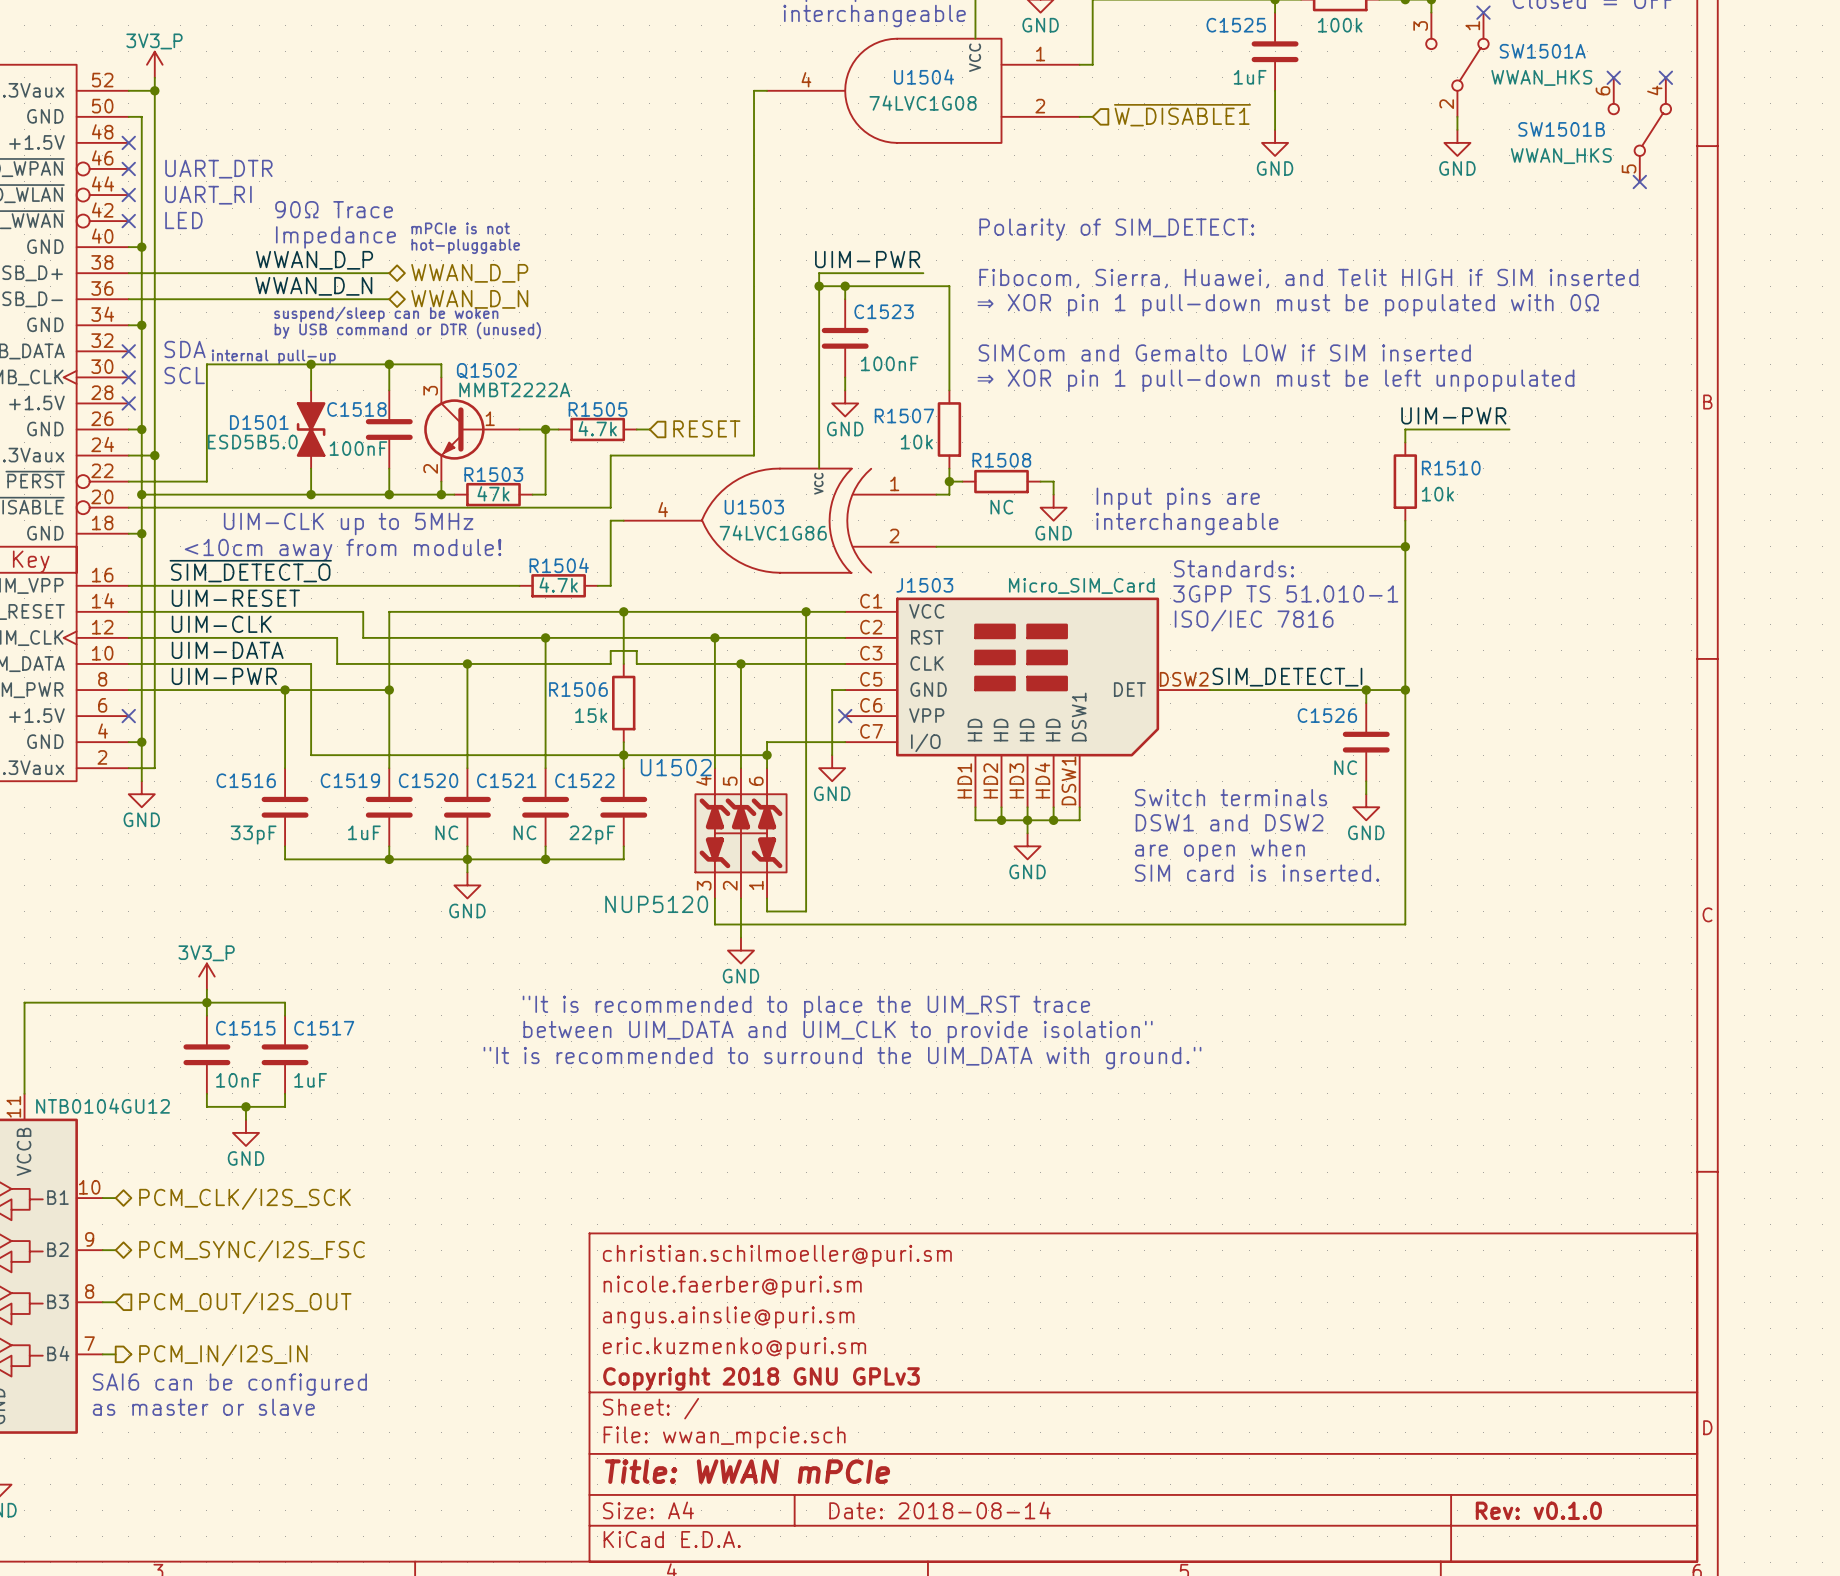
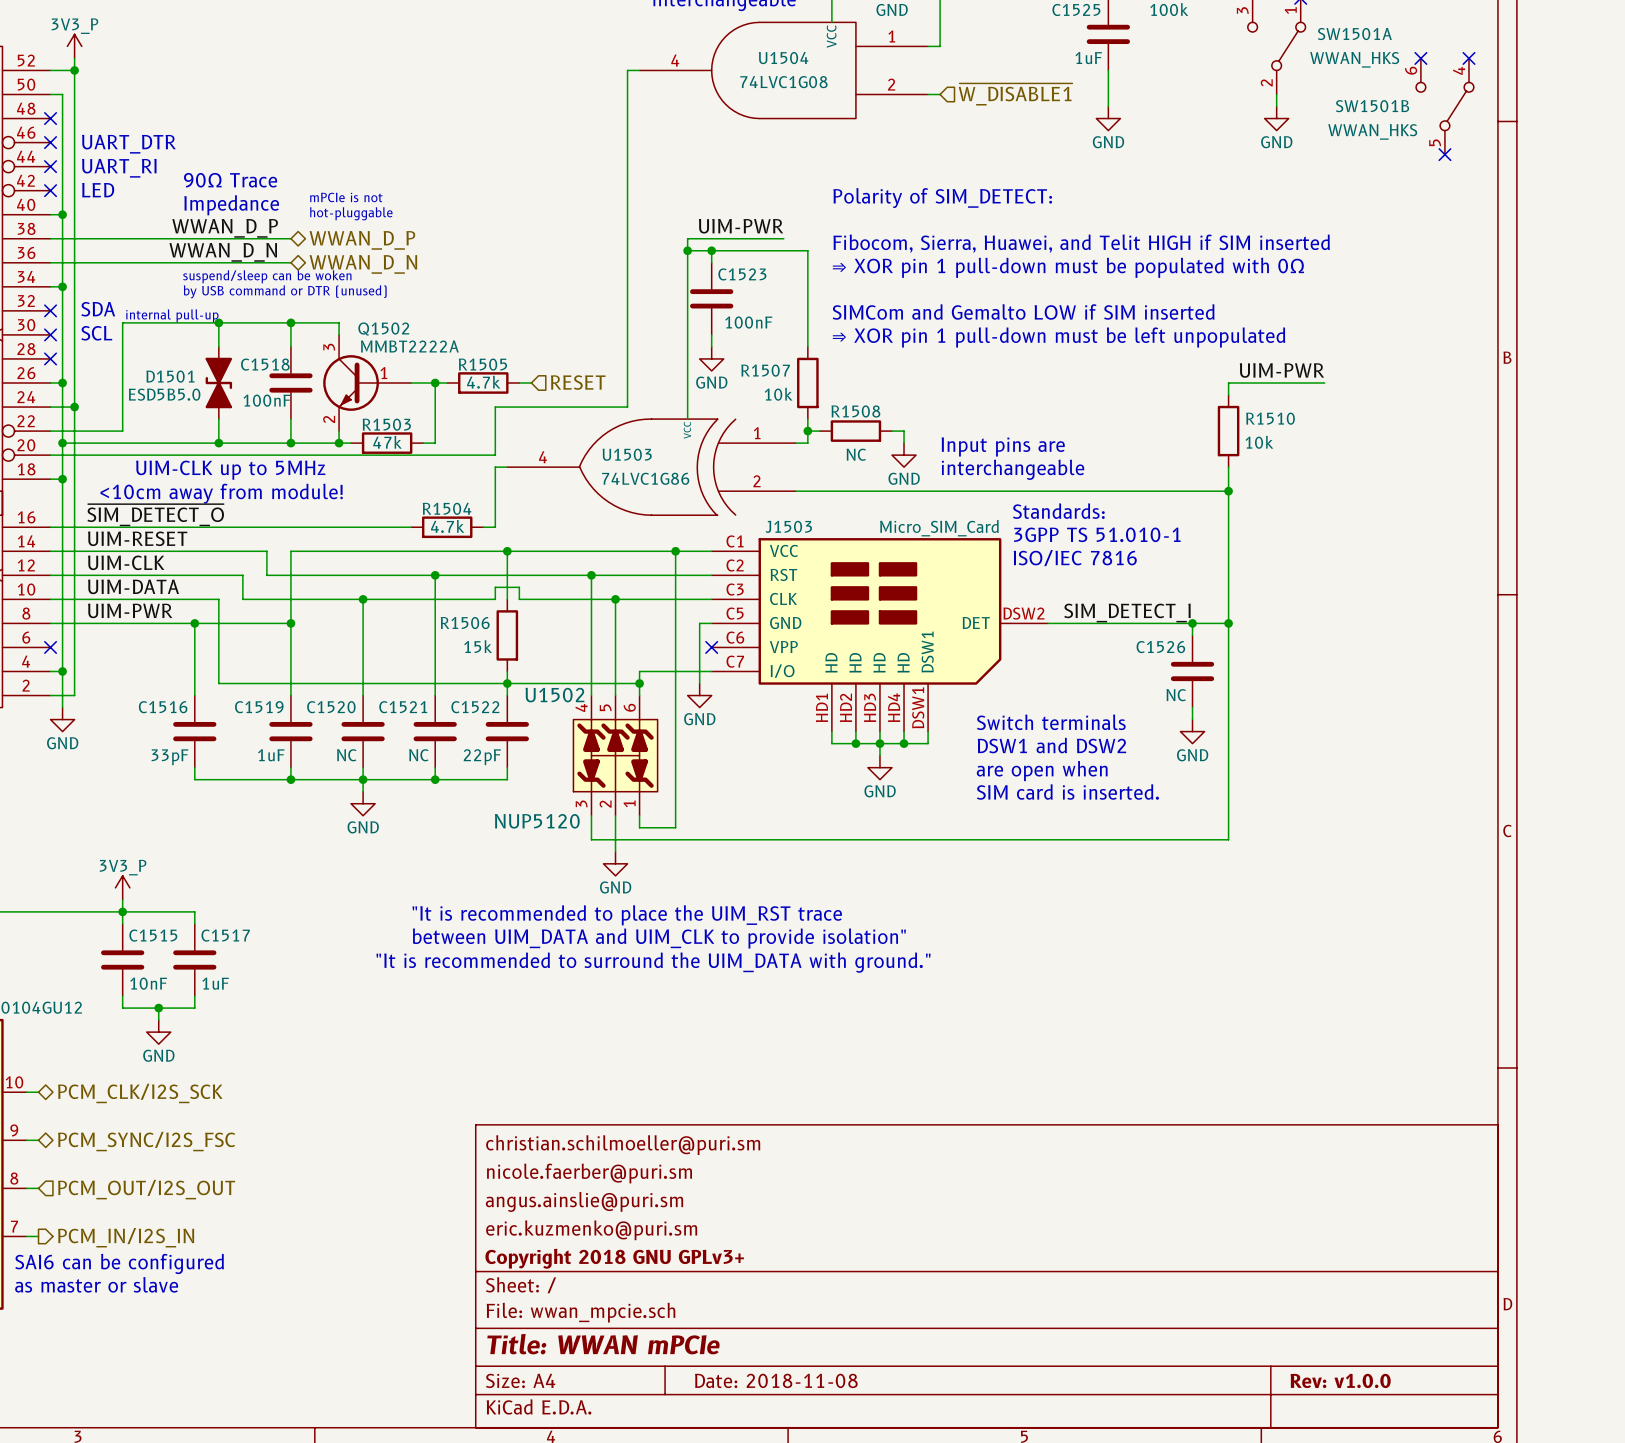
title block: Copyright 2018 GNU GPLv3 (761, 1379) -> Copyright 2018 GNU GPLv3+ (614, 1258)
title block: Date: 2018-08-14 (940, 1510) -> Date: 2018-11-08 (776, 1380)
title block: Rev: v0.1.0 (1538, 1510) -> Rev: v1.0.0 (1340, 1380)

